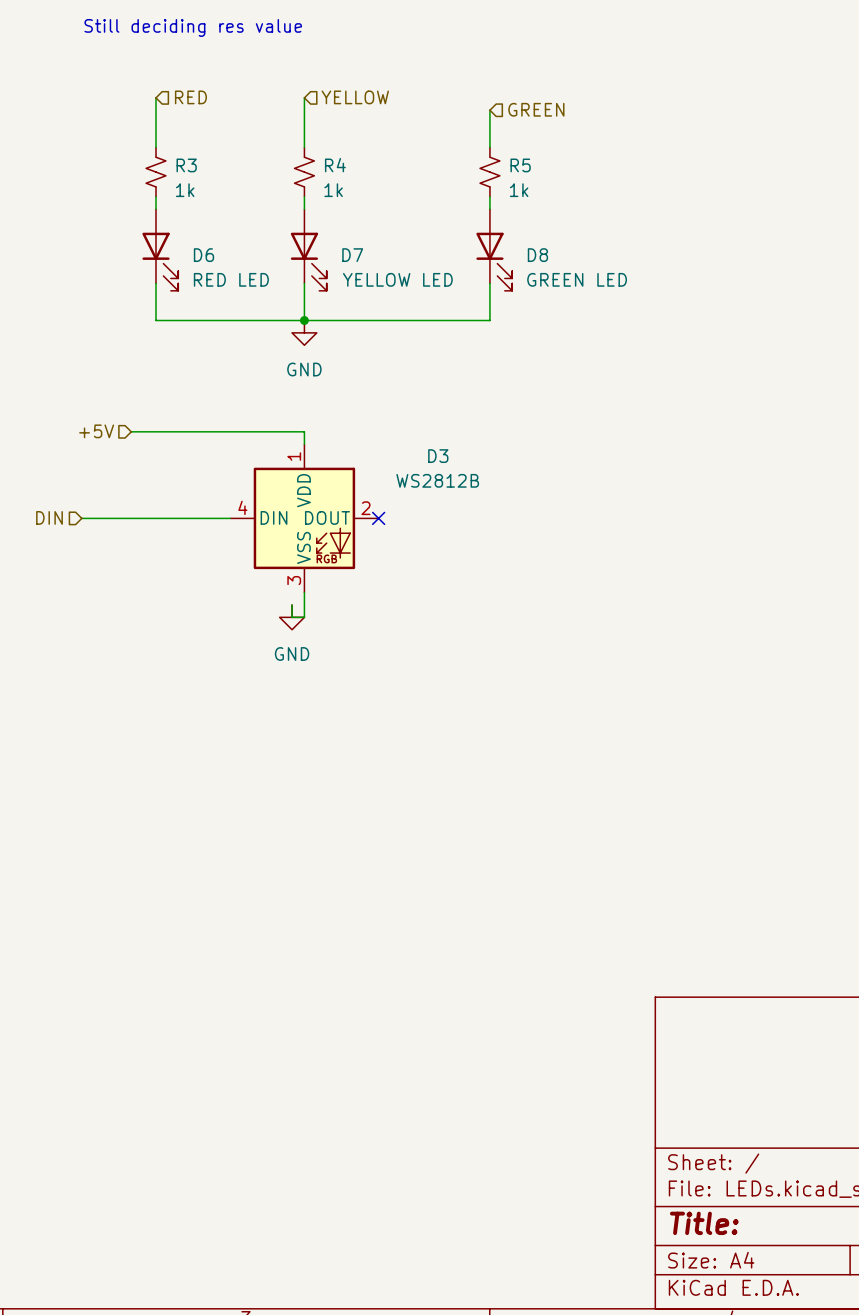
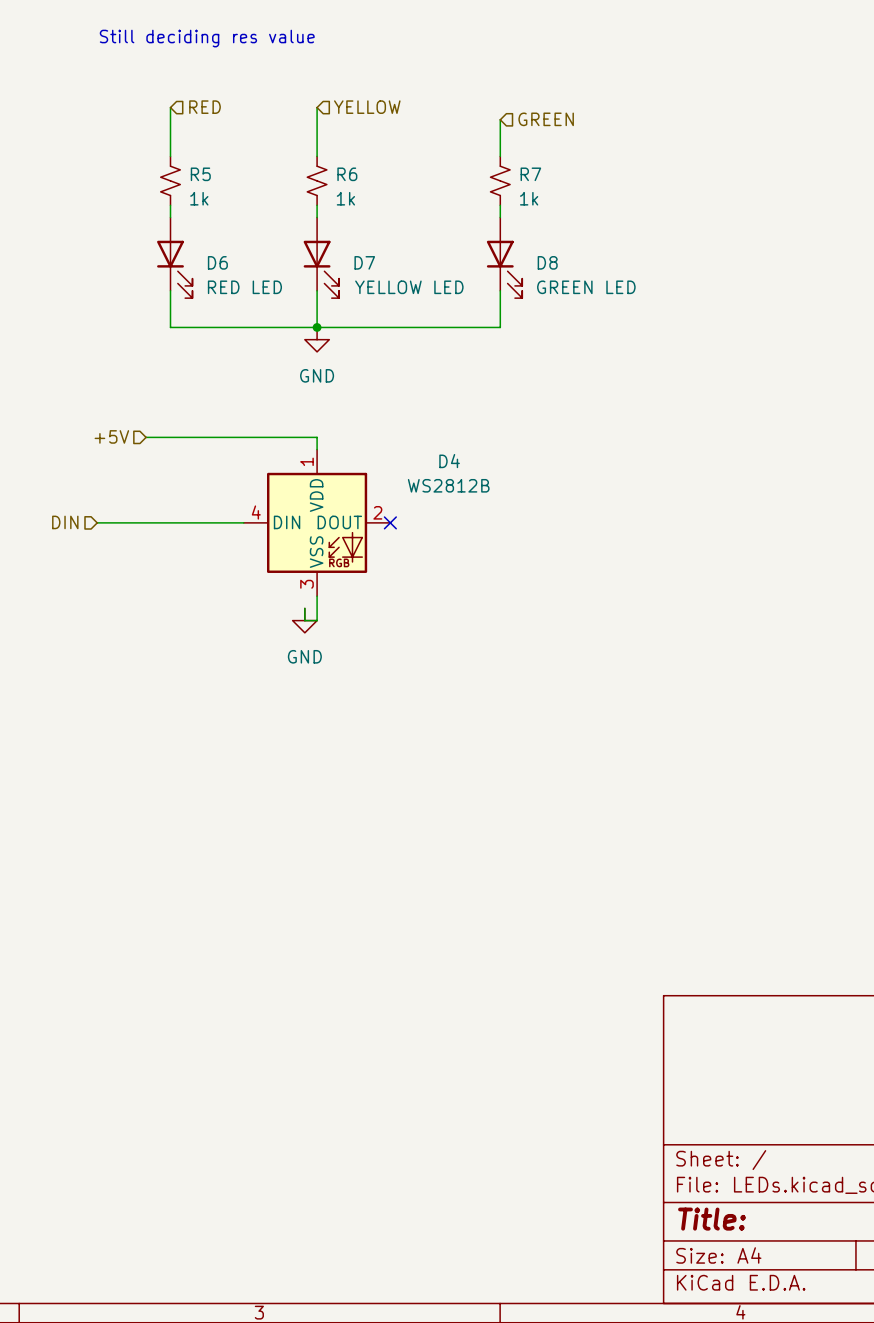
R3 name: R3 (186, 165) -> R5 (200, 174)
R4 name: R4 (335, 165) -> R6 (347, 174)
R5 name: R5 (520, 165) -> R7 (530, 174)
D3 name: D3 (438, 456) -> D4 (449, 461)

